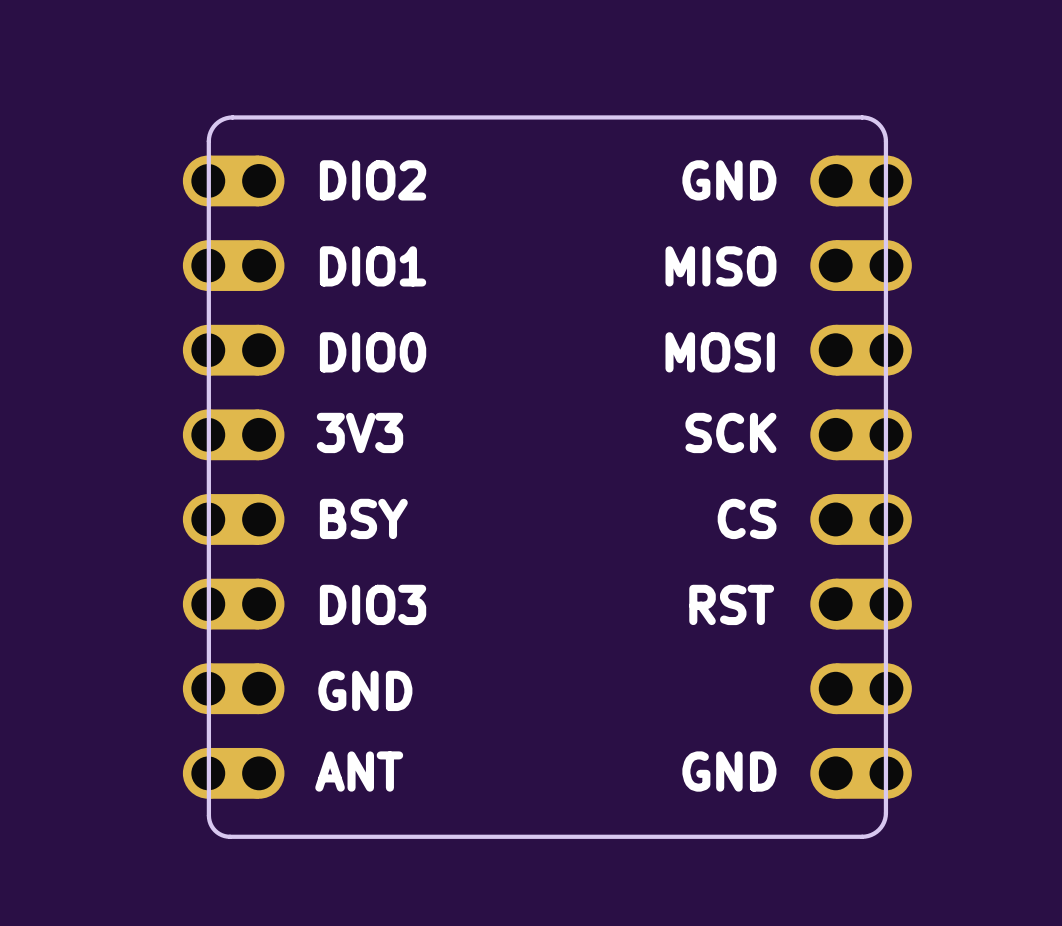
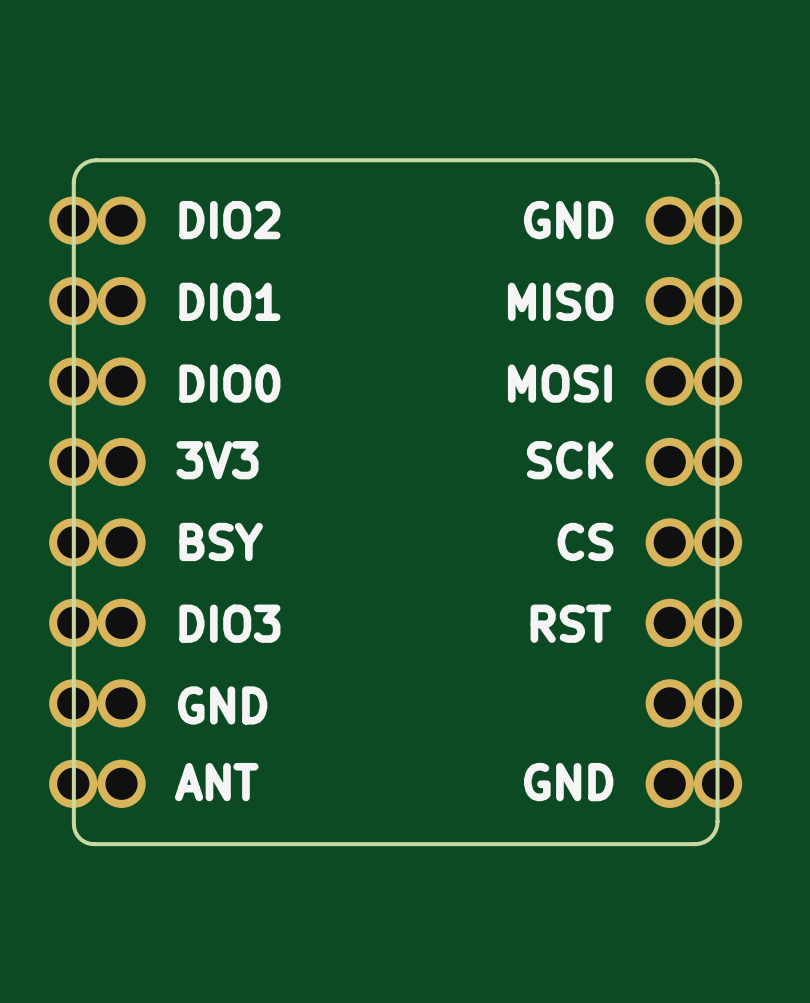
part footprint: [182, 155, 285, 207] -> [49, 196, 146, 245]
part footprint: [810, 155, 912, 207] -> [645, 196, 743, 245]
part footprint: [182, 240, 285, 291] -> [49, 276, 146, 326]
part footprint: [810, 240, 912, 291] -> [645, 276, 743, 326]
part footprint: [182, 324, 285, 376] -> [49, 357, 146, 406]
part footprint: [810, 324, 912, 376] -> [645, 357, 743, 406]
part footprint: [182, 409, 285, 461] -> [49, 437, 146, 487]
part footprint: [810, 409, 912, 461] -> [645, 437, 743, 487]
part footprint: [182, 494, 285, 545] -> [49, 518, 146, 567]
part footprint: [810, 494, 912, 545] -> [645, 518, 743, 567]
part footprint: [182, 578, 285, 630] -> [49, 598, 146, 648]
part footprint: [810, 578, 912, 630] -> [645, 598, 743, 648]
part footprint: [182, 663, 285, 715] -> [49, 679, 146, 728]
part footprint: [810, 663, 912, 715] -> [645, 679, 743, 728]
part footprint: [182, 747, 285, 799] -> [49, 759, 146, 808]
part footprint: [810, 747, 912, 799] -> [645, 759, 743, 808]

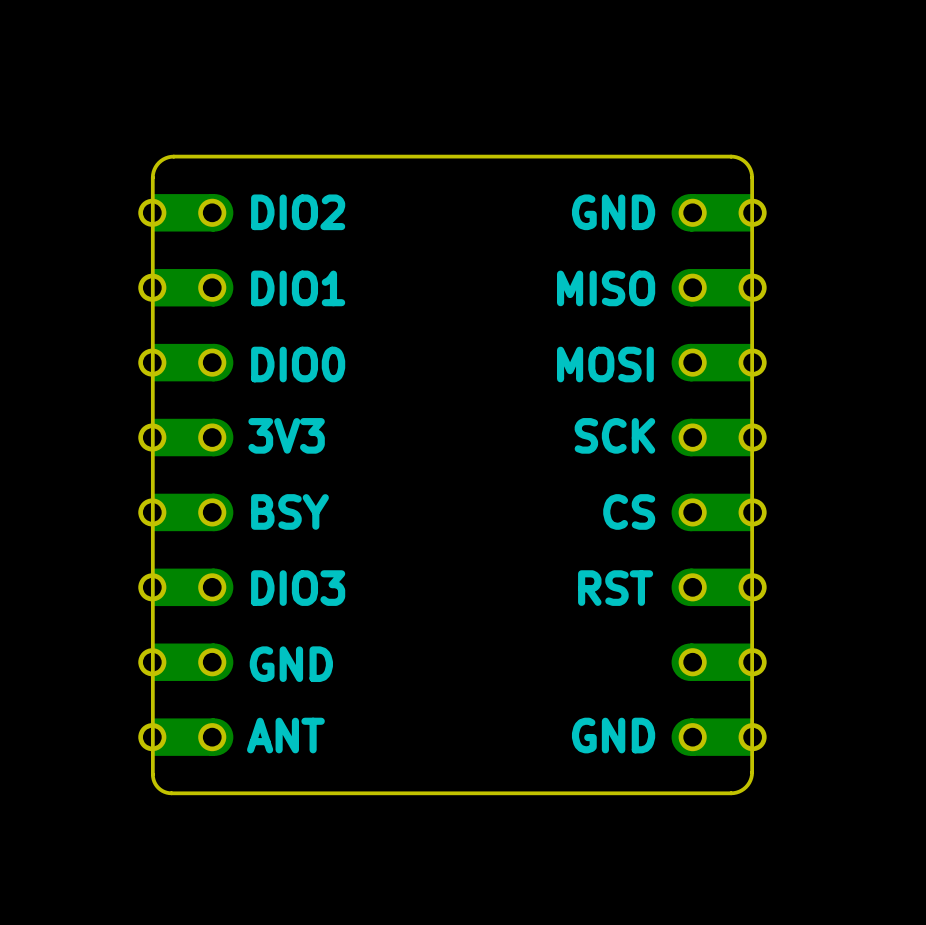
part footprint: [49, 196, 146, 245] -> [138, 194, 234, 232]
part footprint: [645, 196, 743, 245] -> [671, 194, 767, 232]
part footprint: [49, 276, 146, 326] -> [138, 268, 234, 307]
part footprint: [645, 276, 743, 326] -> [671, 268, 767, 307]
part footprint: [49, 357, 146, 406] -> [138, 343, 234, 382]
part footprint: [645, 357, 743, 406] -> [671, 343, 767, 382]
part footprint: [49, 437, 146, 487] -> [138, 418, 234, 457]
part footprint: [645, 437, 743, 487] -> [671, 418, 767, 457]
part footprint: [49, 518, 146, 567] -> [138, 493, 234, 532]
part footprint: [645, 518, 743, 567] -> [671, 493, 767, 532]
part footprint: [49, 598, 146, 648] -> [138, 568, 234, 607]
part footprint: [645, 598, 743, 648] -> [671, 568, 767, 607]
part footprint: [49, 679, 146, 728] -> [138, 643, 234, 681]
part footprint: [645, 679, 743, 728] -> [671, 643, 767, 681]
part footprint: [49, 759, 146, 808] -> [138, 718, 234, 756]
part footprint: [645, 759, 743, 808] -> [671, 718, 767, 756]

